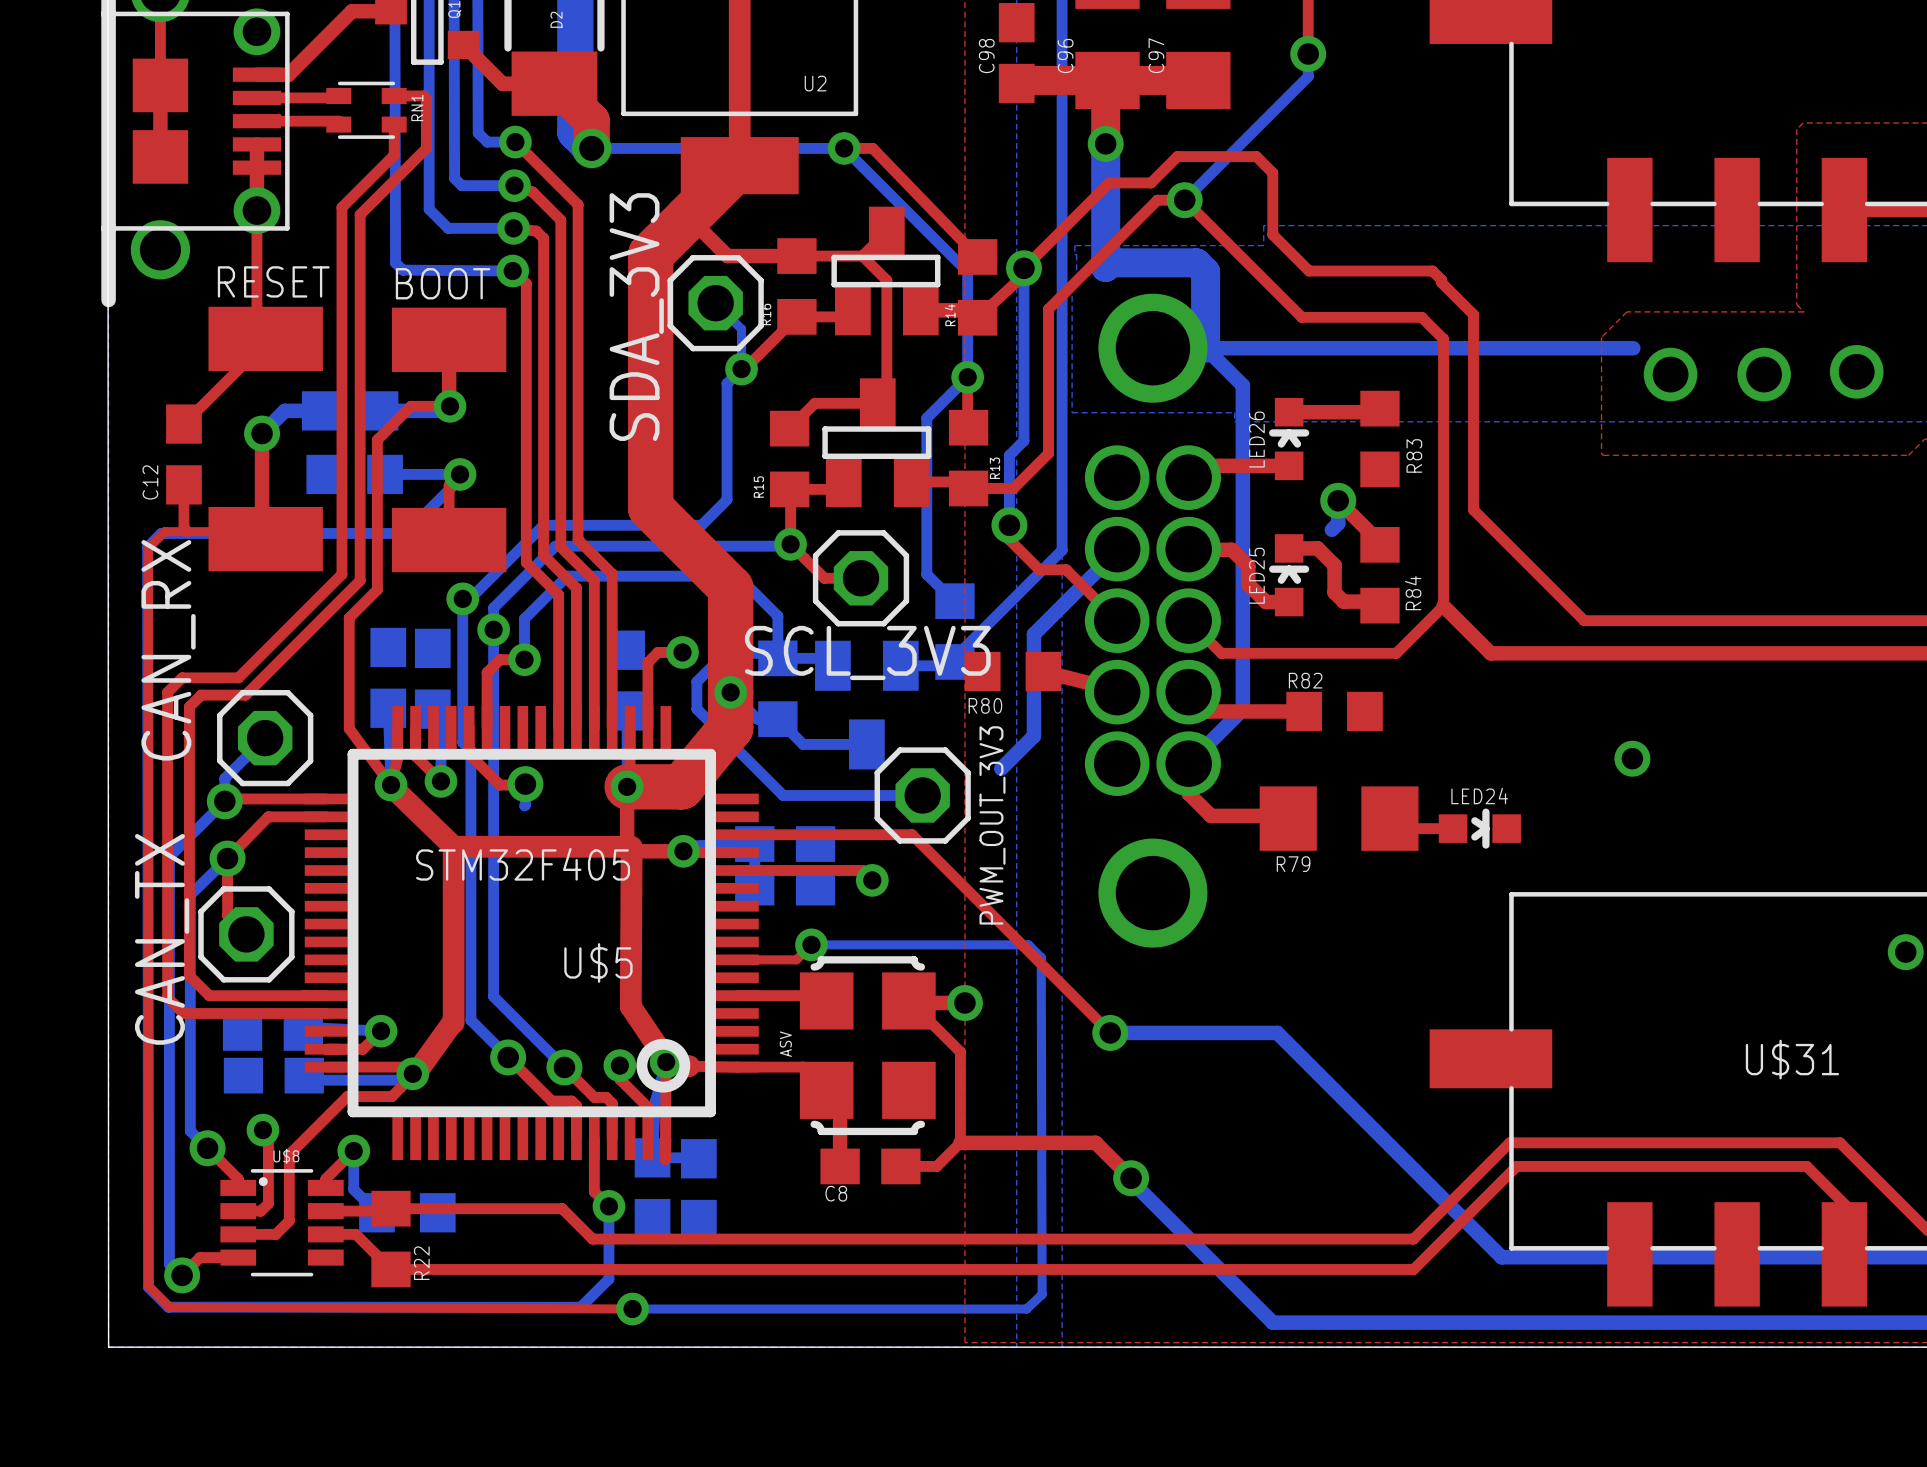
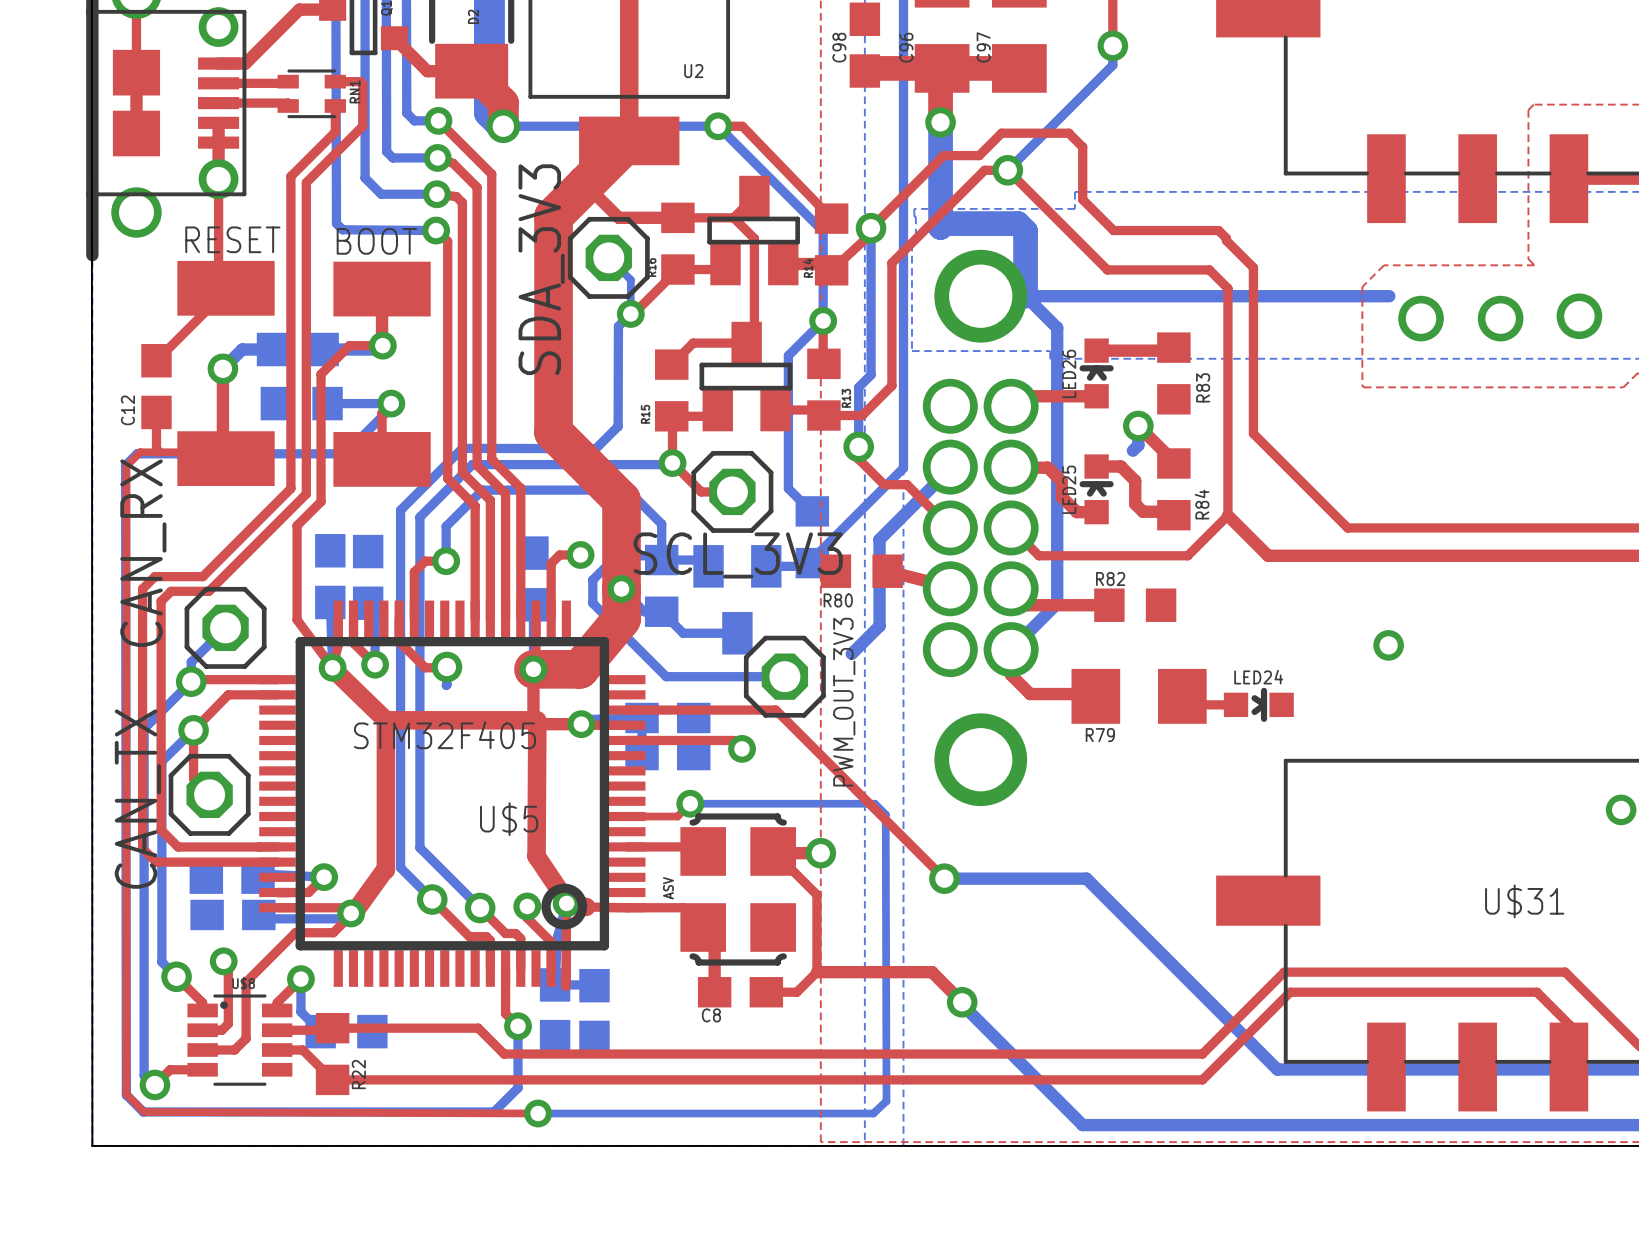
bottom track: (727, 383) (727, 499) (701, 525) (543, 525) (470, 598) -> (618, 326) (618, 426) (595, 448) (462, 448) (400, 510) (400, 638)
bottom track: (473, 595) (473, 598) (462, 598) (462, 742) (470, 750) -> none
via: (462, 598) -> none
via: (493, 629) -> none

